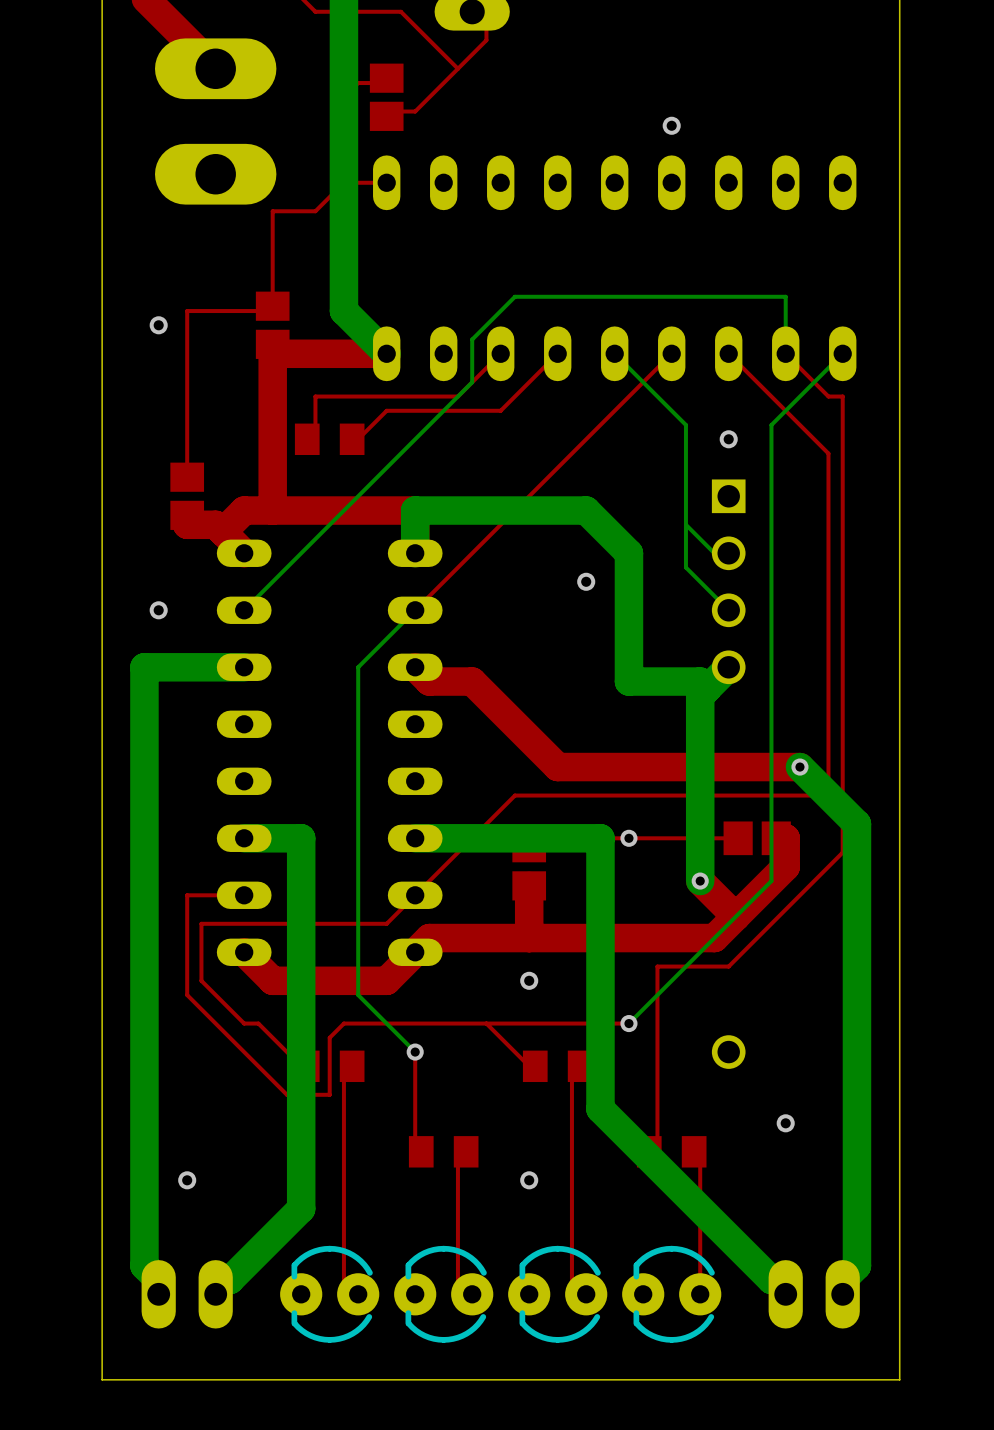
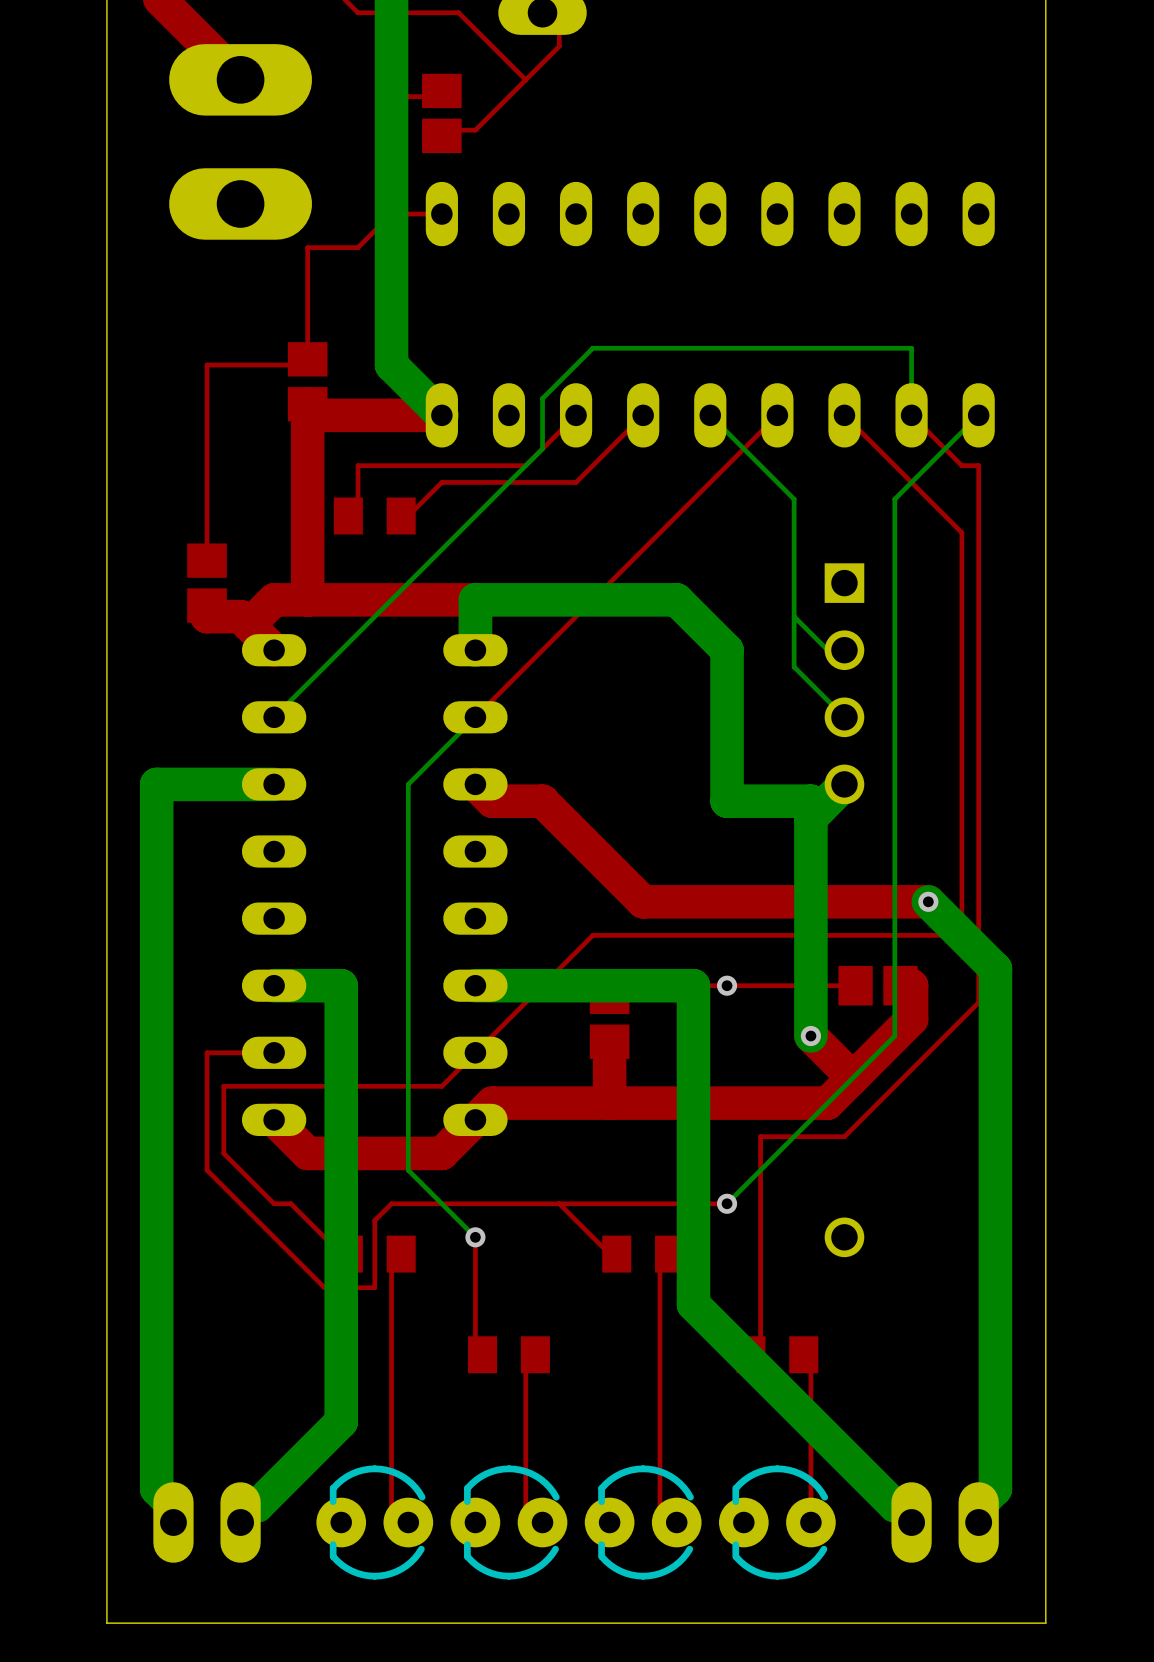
via: (671, 125) -> none
via: (158, 325) -> none
via: (728, 439) -> none
via: (586, 581) -> none
via: (158, 610) -> none
via: (529, 980) -> none
via: (785, 1123) -> none
via: (187, 1180) -> none
via: (529, 1180) -> none

